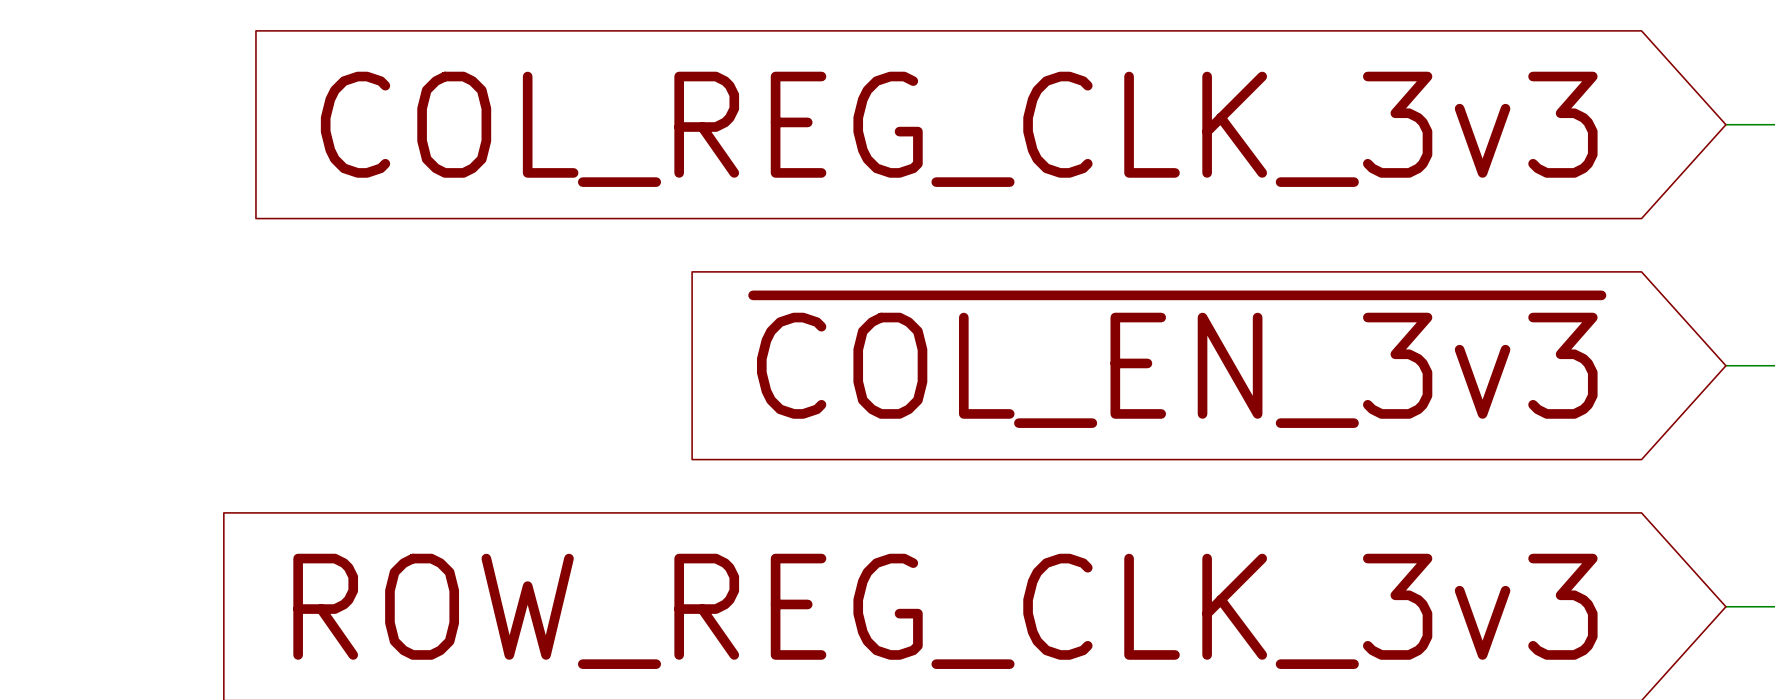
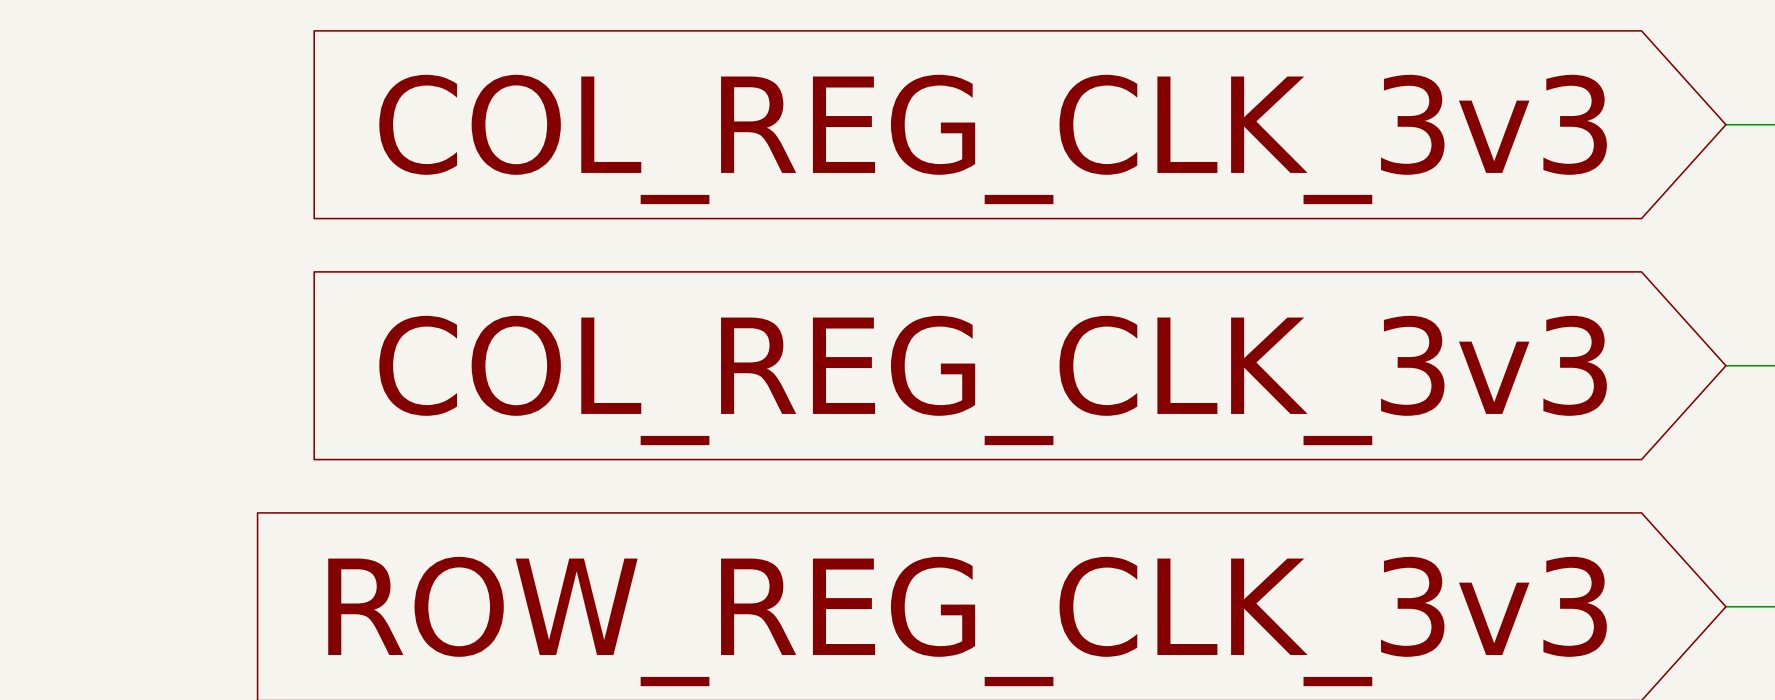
global label: ~{COL_EN_3v3} (1177, 359) -> COL_REG_CLK_3v3 (993, 380)

